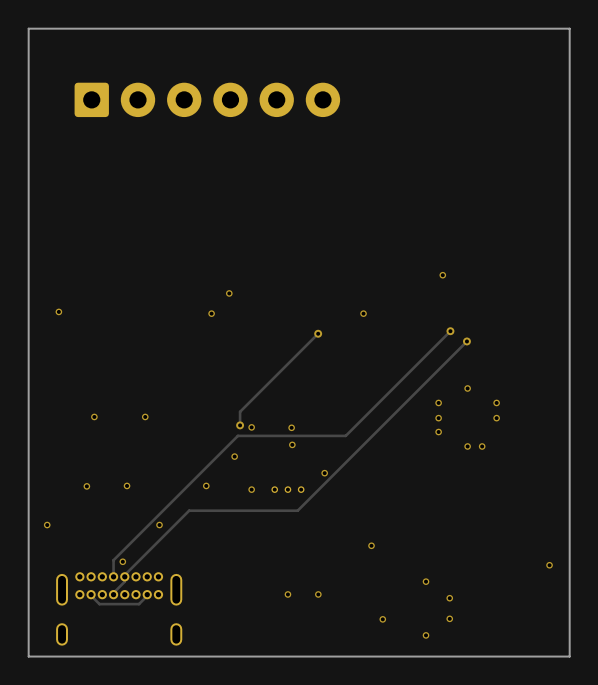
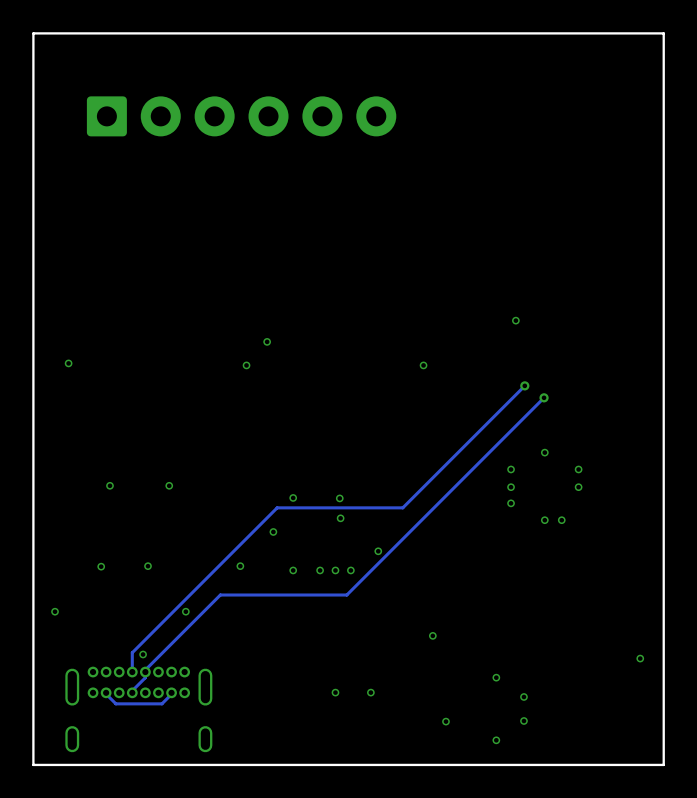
track: (318, 333) (240, 411) (240, 425) -> none
via: (318, 333) -> none
via: (240, 425) -> none

